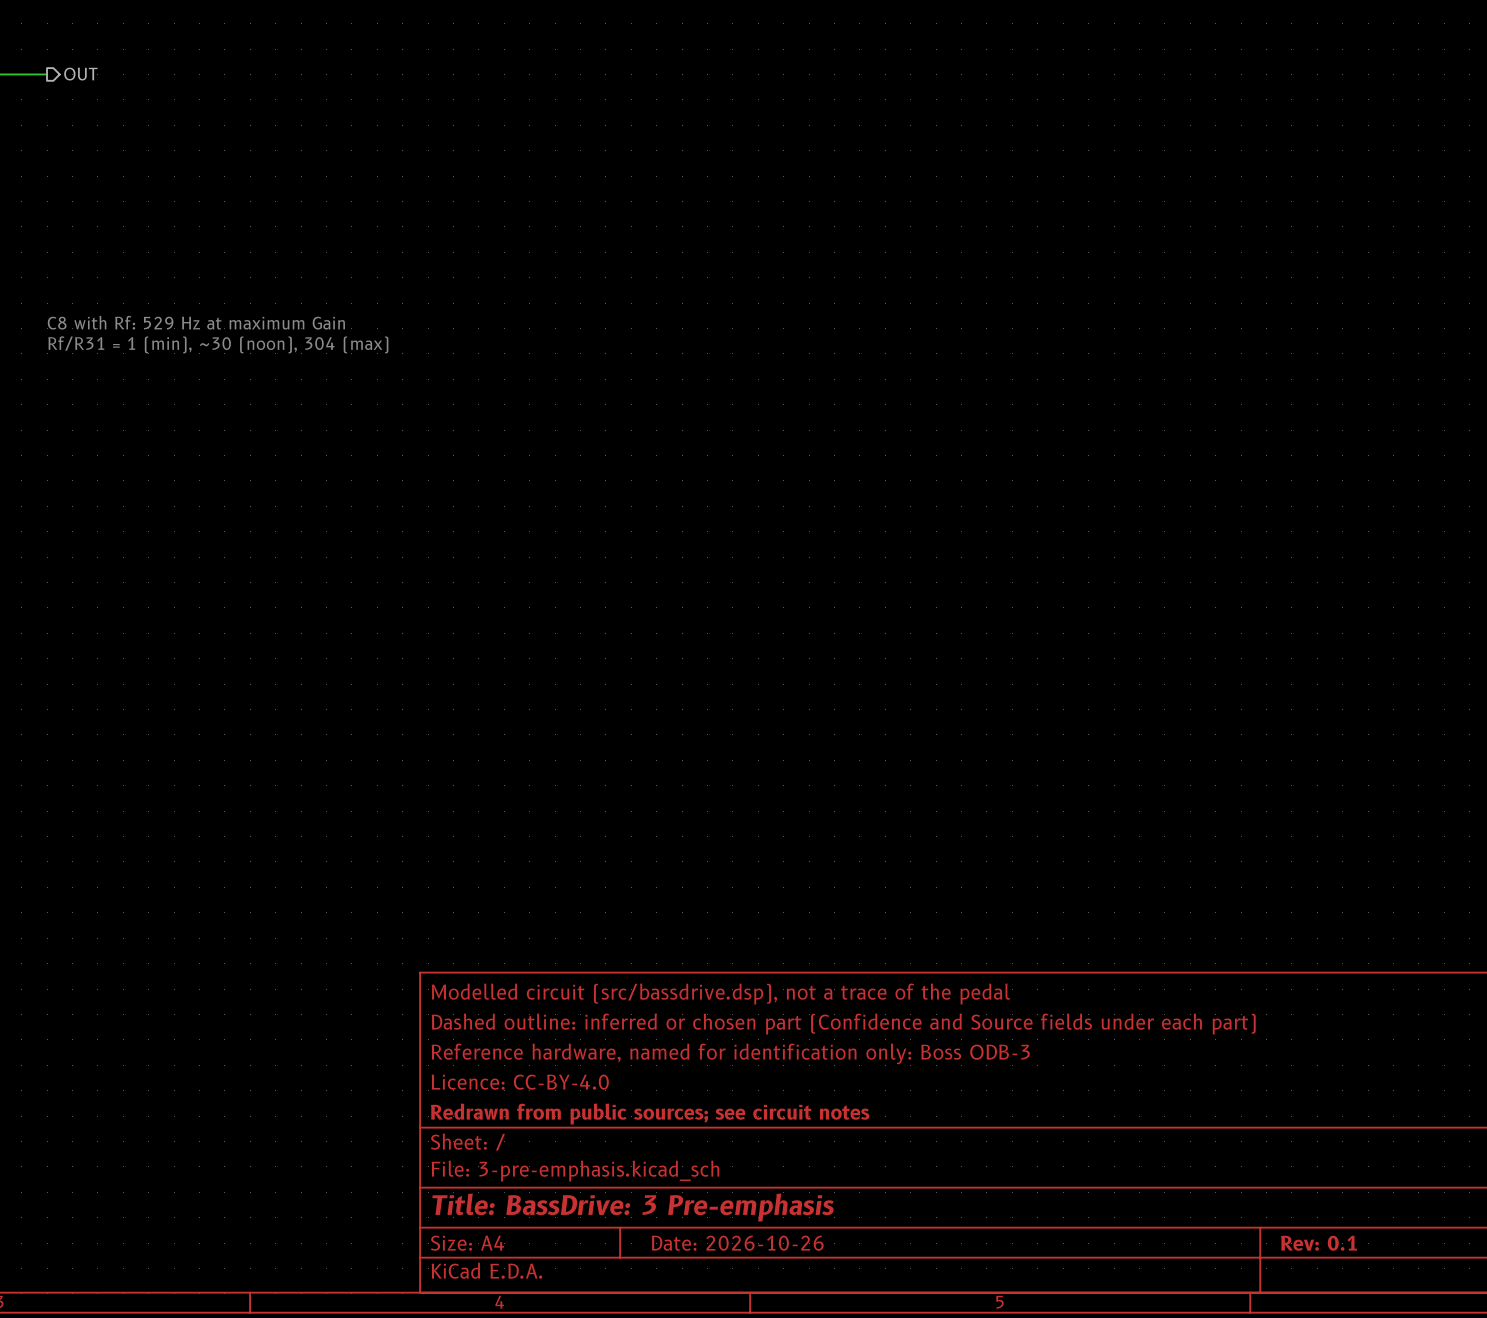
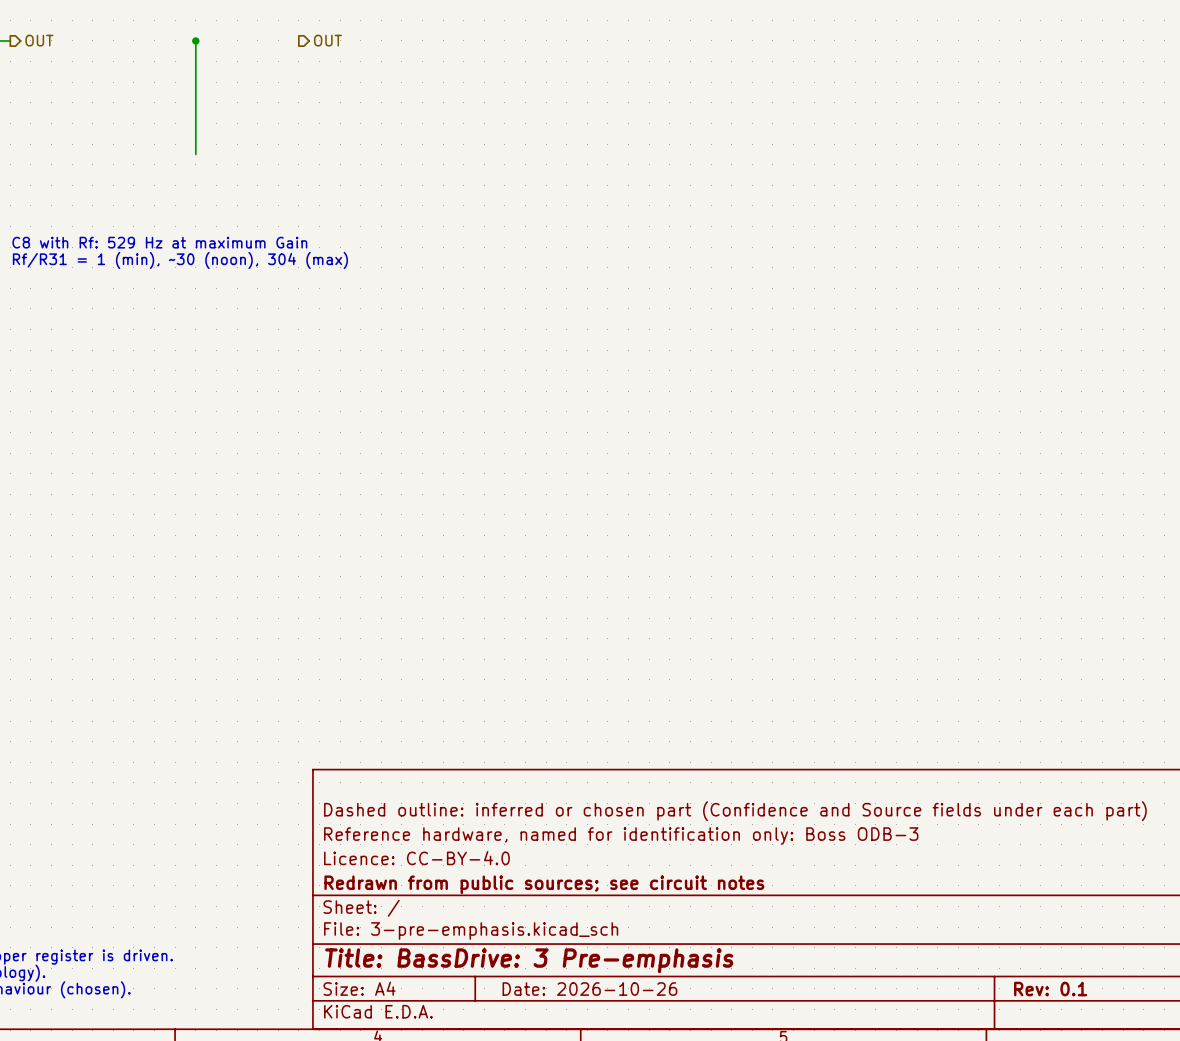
wire: none -> (195, 40) (195, 154)
junction: none -> (195, 40)
hierarchical label: none -> OUT (327, 40)
title block: Modelled circuit (src/bassdrive.dsp), not a trace of the pedal (720, 994) -> none

